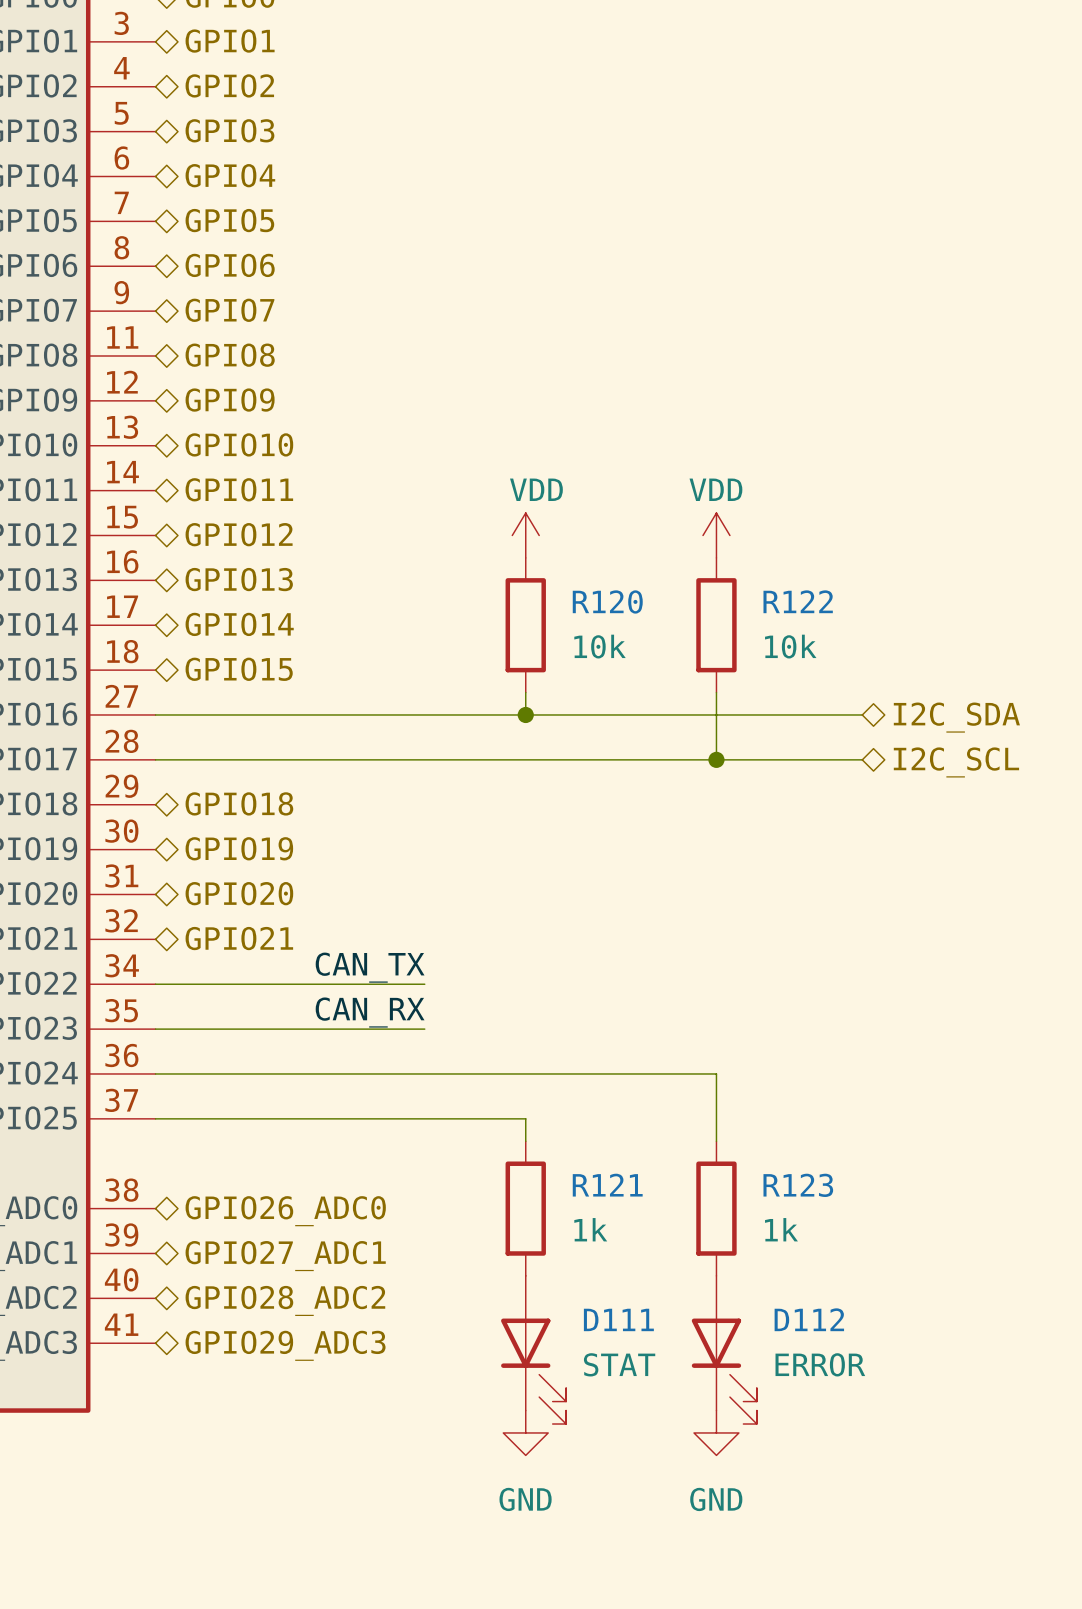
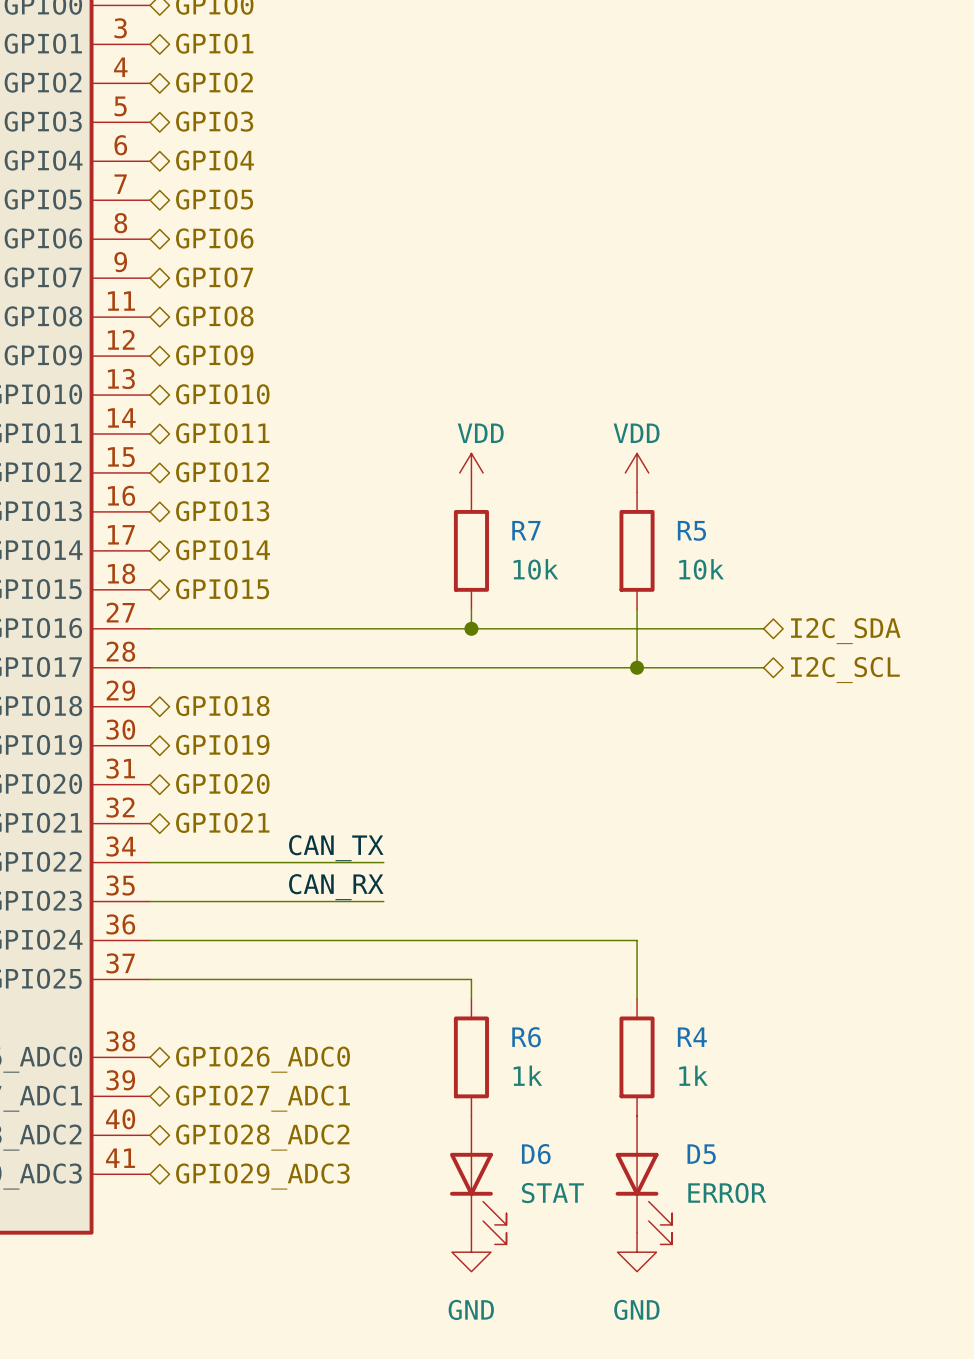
R120 name: R120 (607, 601) -> R7 (526, 530)
R122 name: R122 (798, 601) -> R5 (691, 530)
R121 name: R121 (607, 1185) -> R6 (526, 1037)
R123 name: R123 (798, 1185) -> R4 (692, 1037)
D111 name: D111 (618, 1319) -> D6 (536, 1154)
D112 name: D112 (809, 1319) -> D5 (701, 1154)

